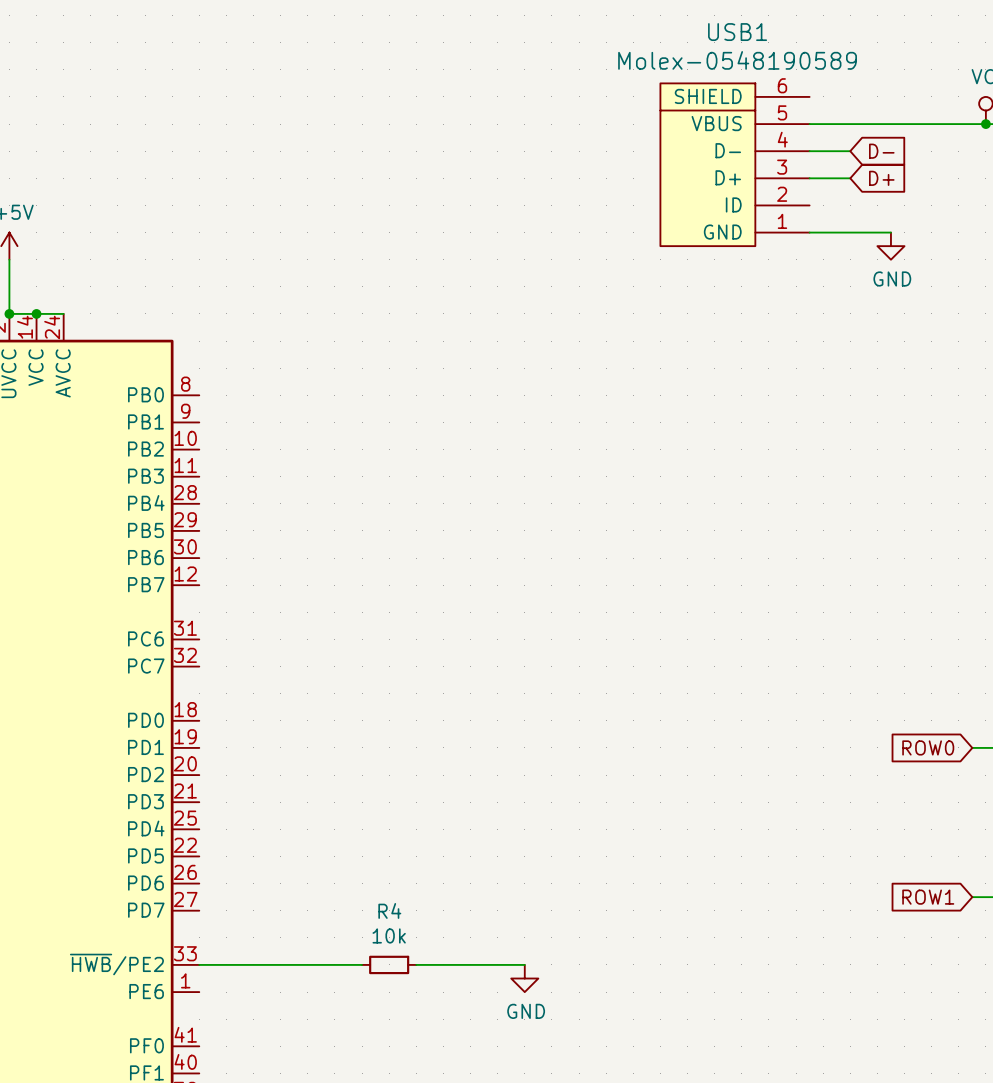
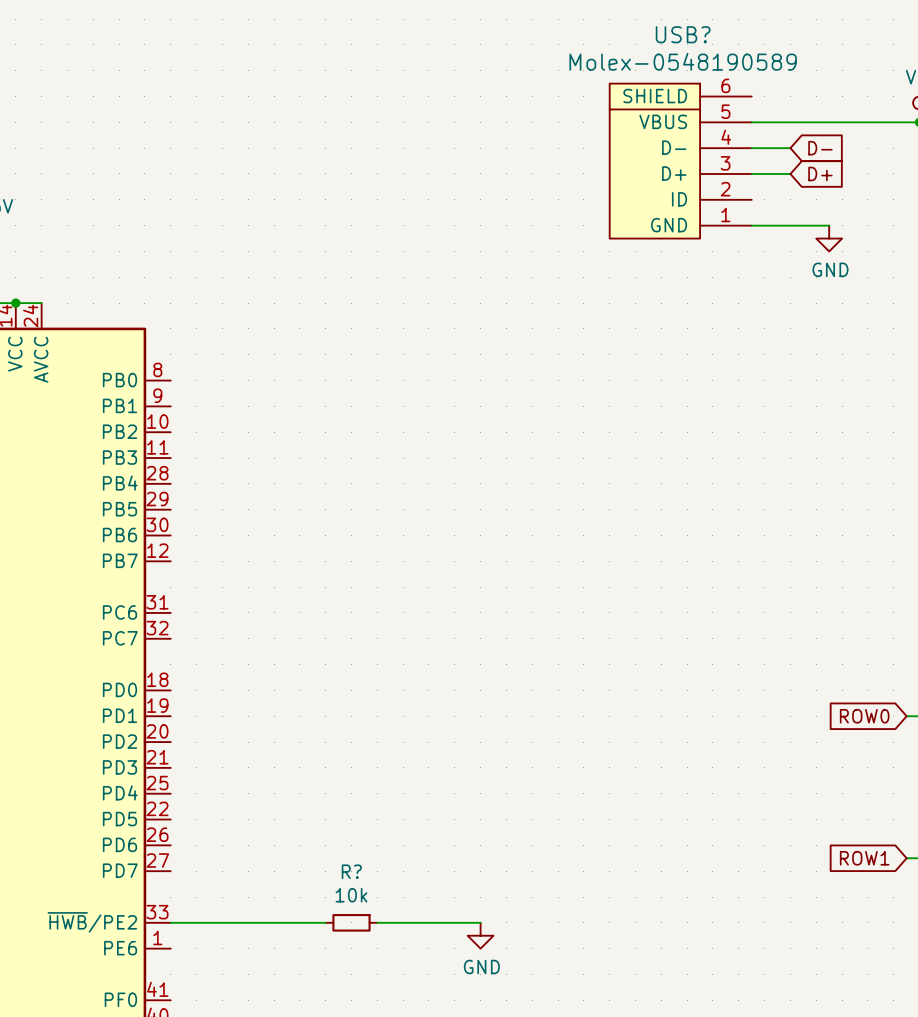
USB1 name: USB1 (737, 32) -> USB? (683, 34)
R4 name: R4 (389, 910) -> R? (351, 871)

